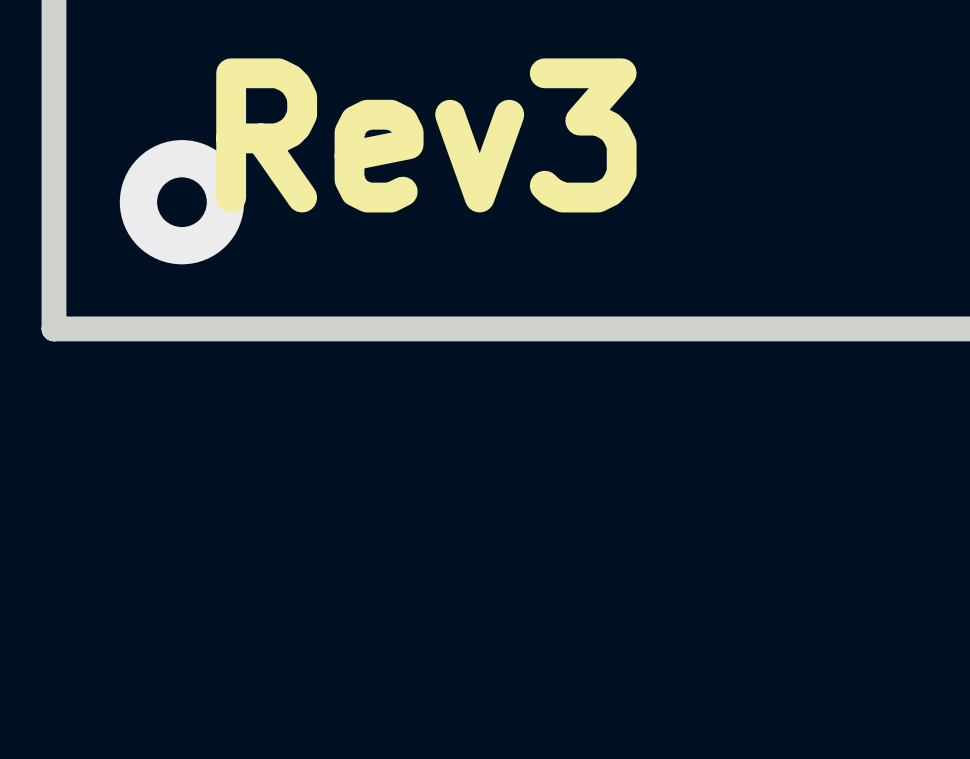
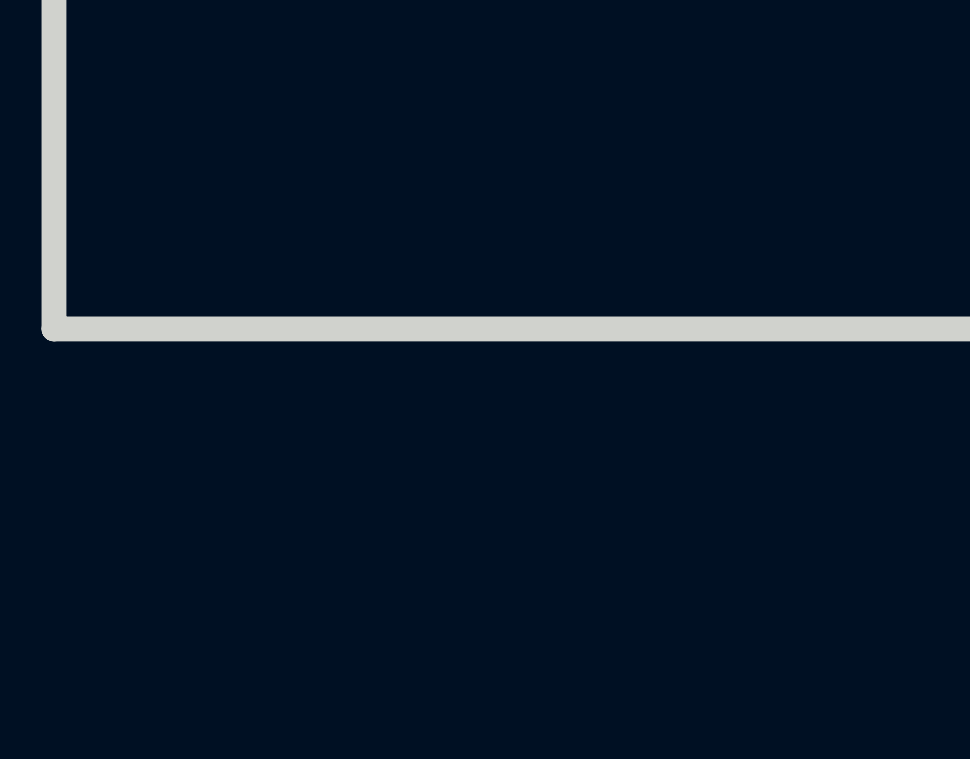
text: Rev3 (426, 135) -> none
via: (181, 202) -> none

